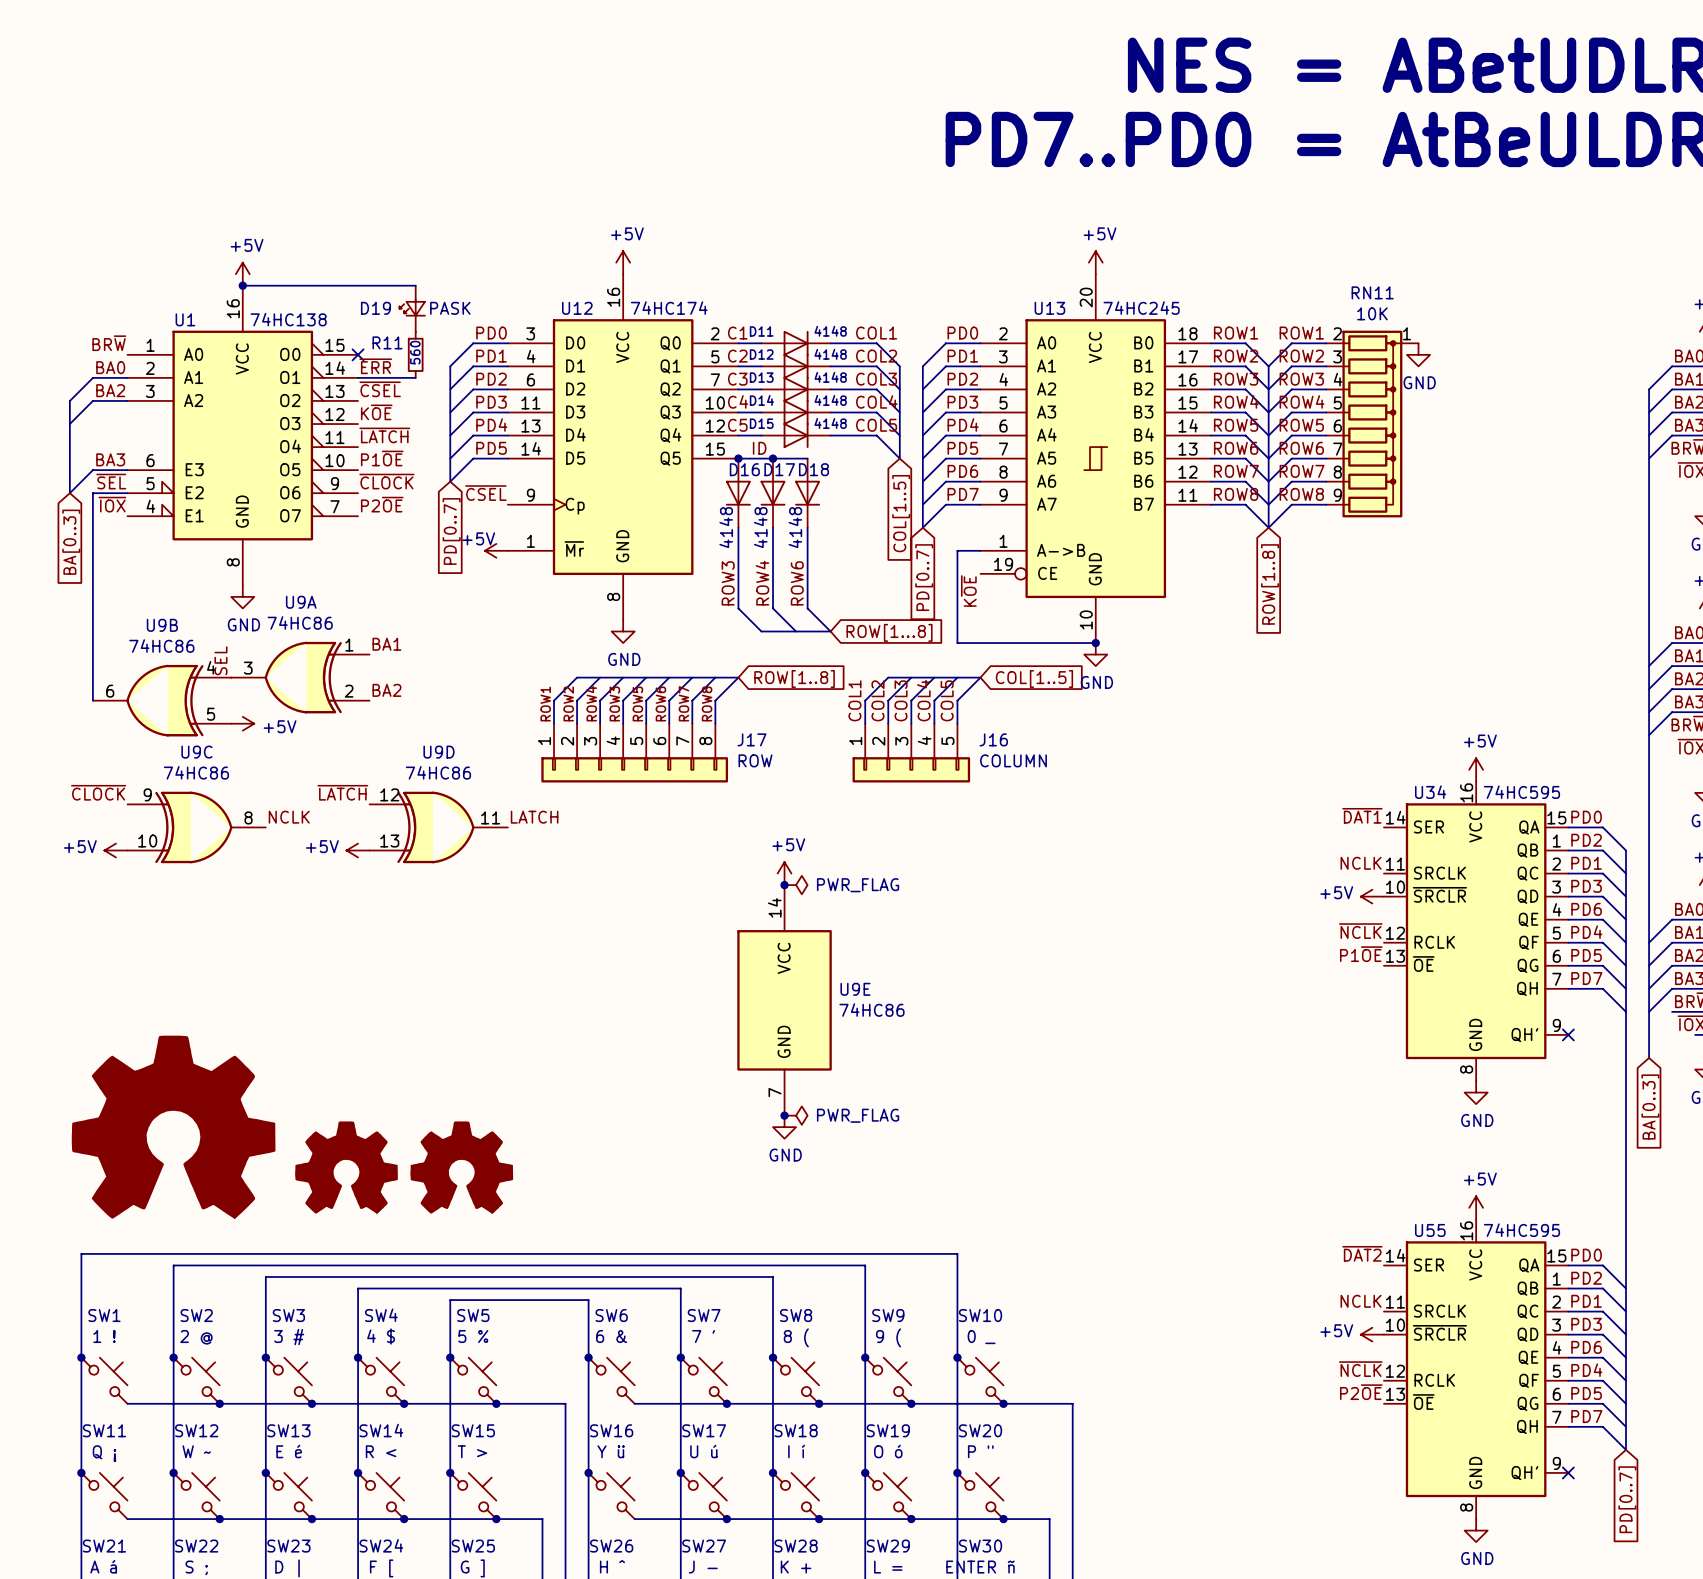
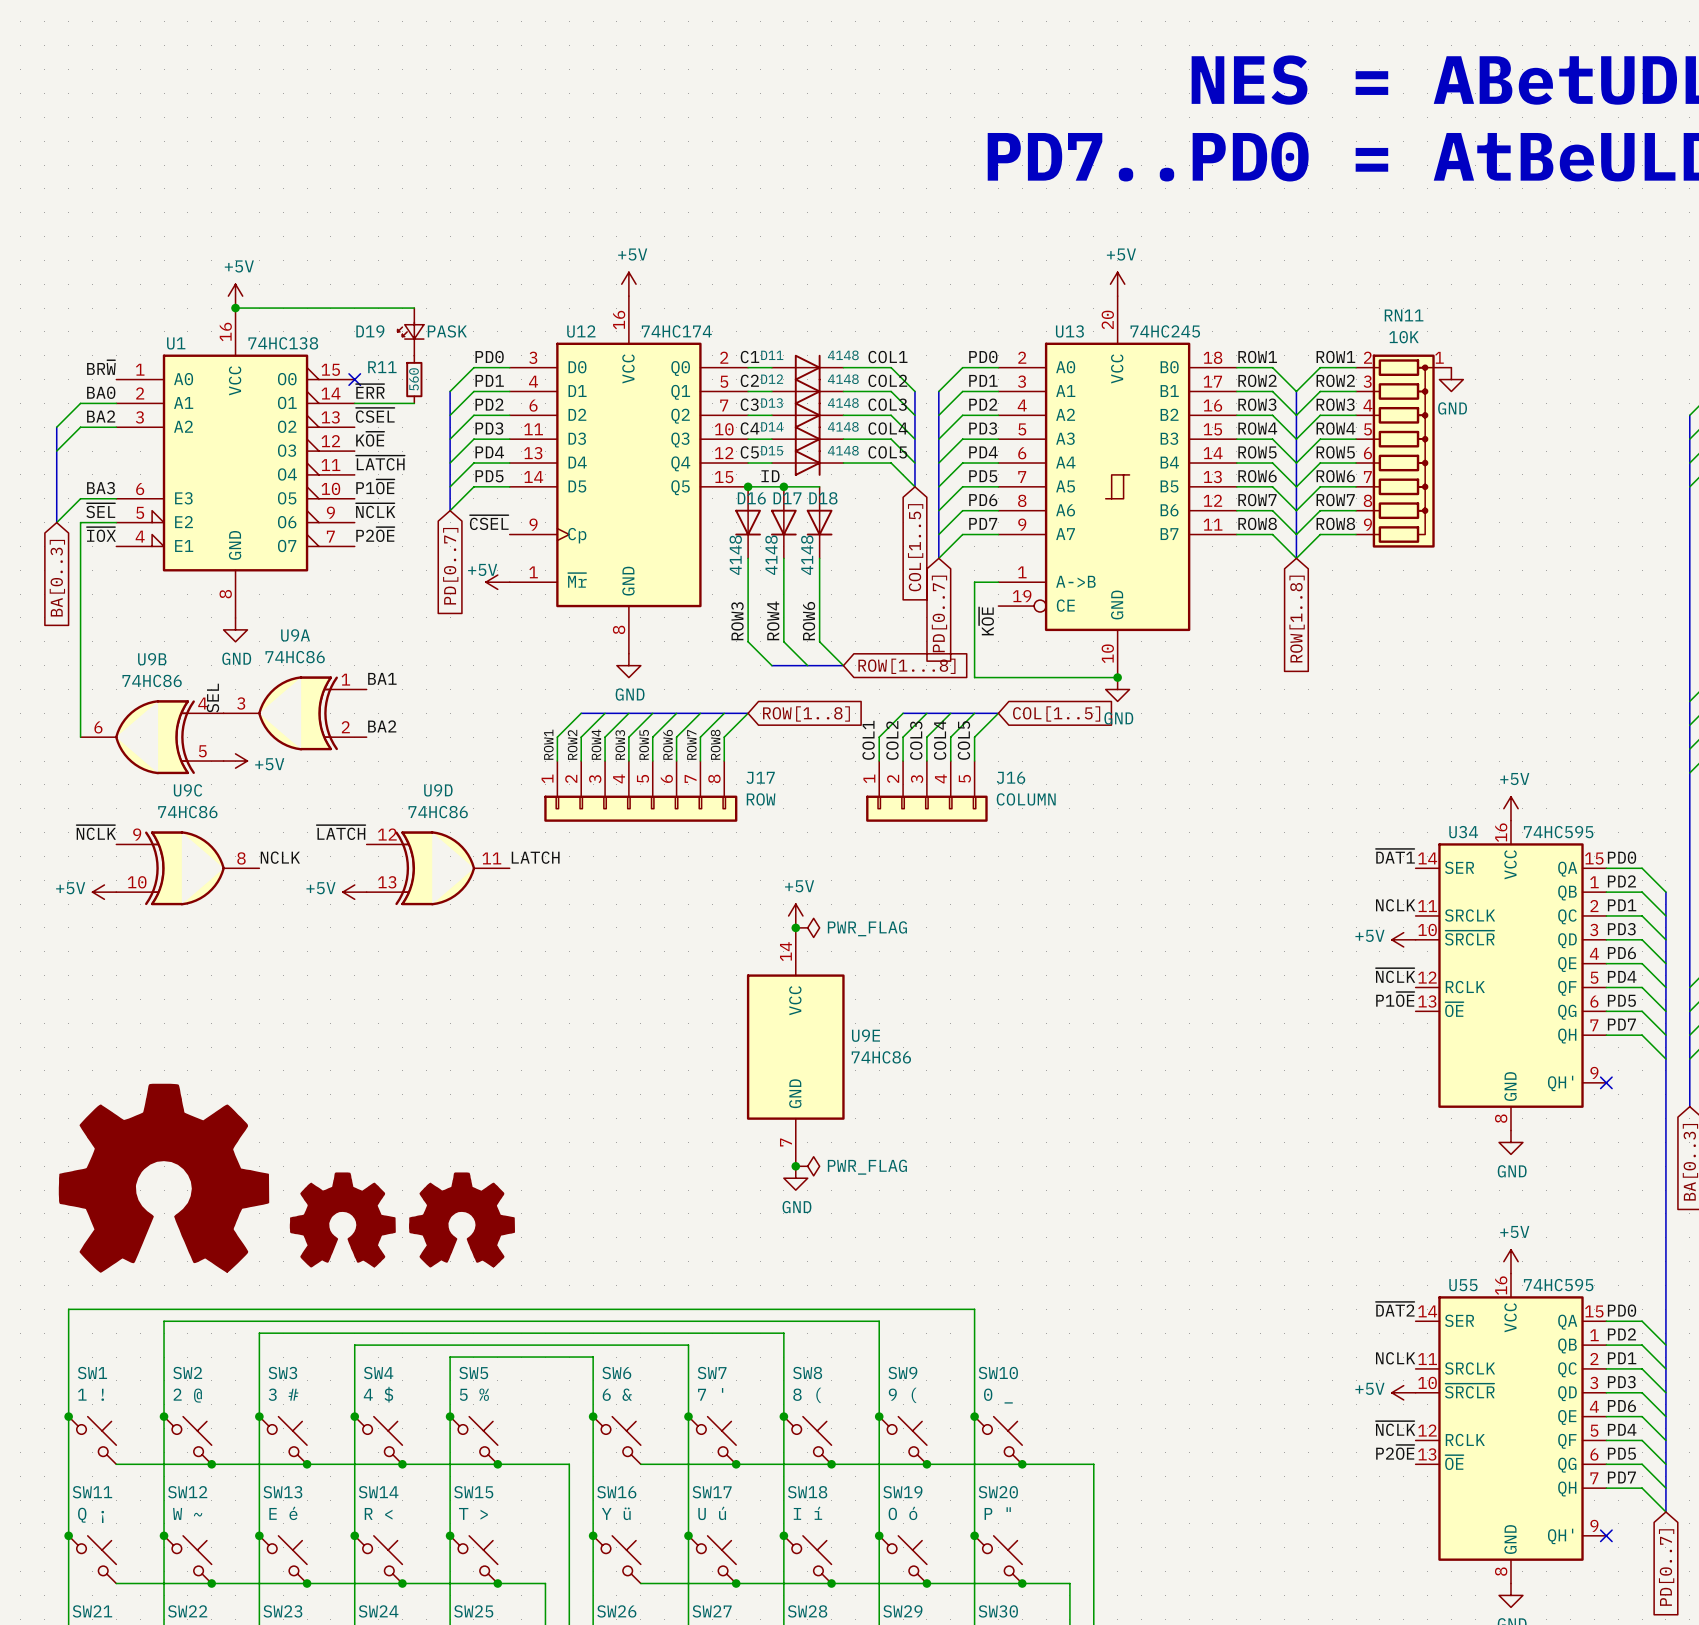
label: ~{CLOCK} (386, 481) -> ~{NCLK} (375, 510)
label: ~{CLOCK} (98, 792) -> ~{NCLK} (96, 832)

